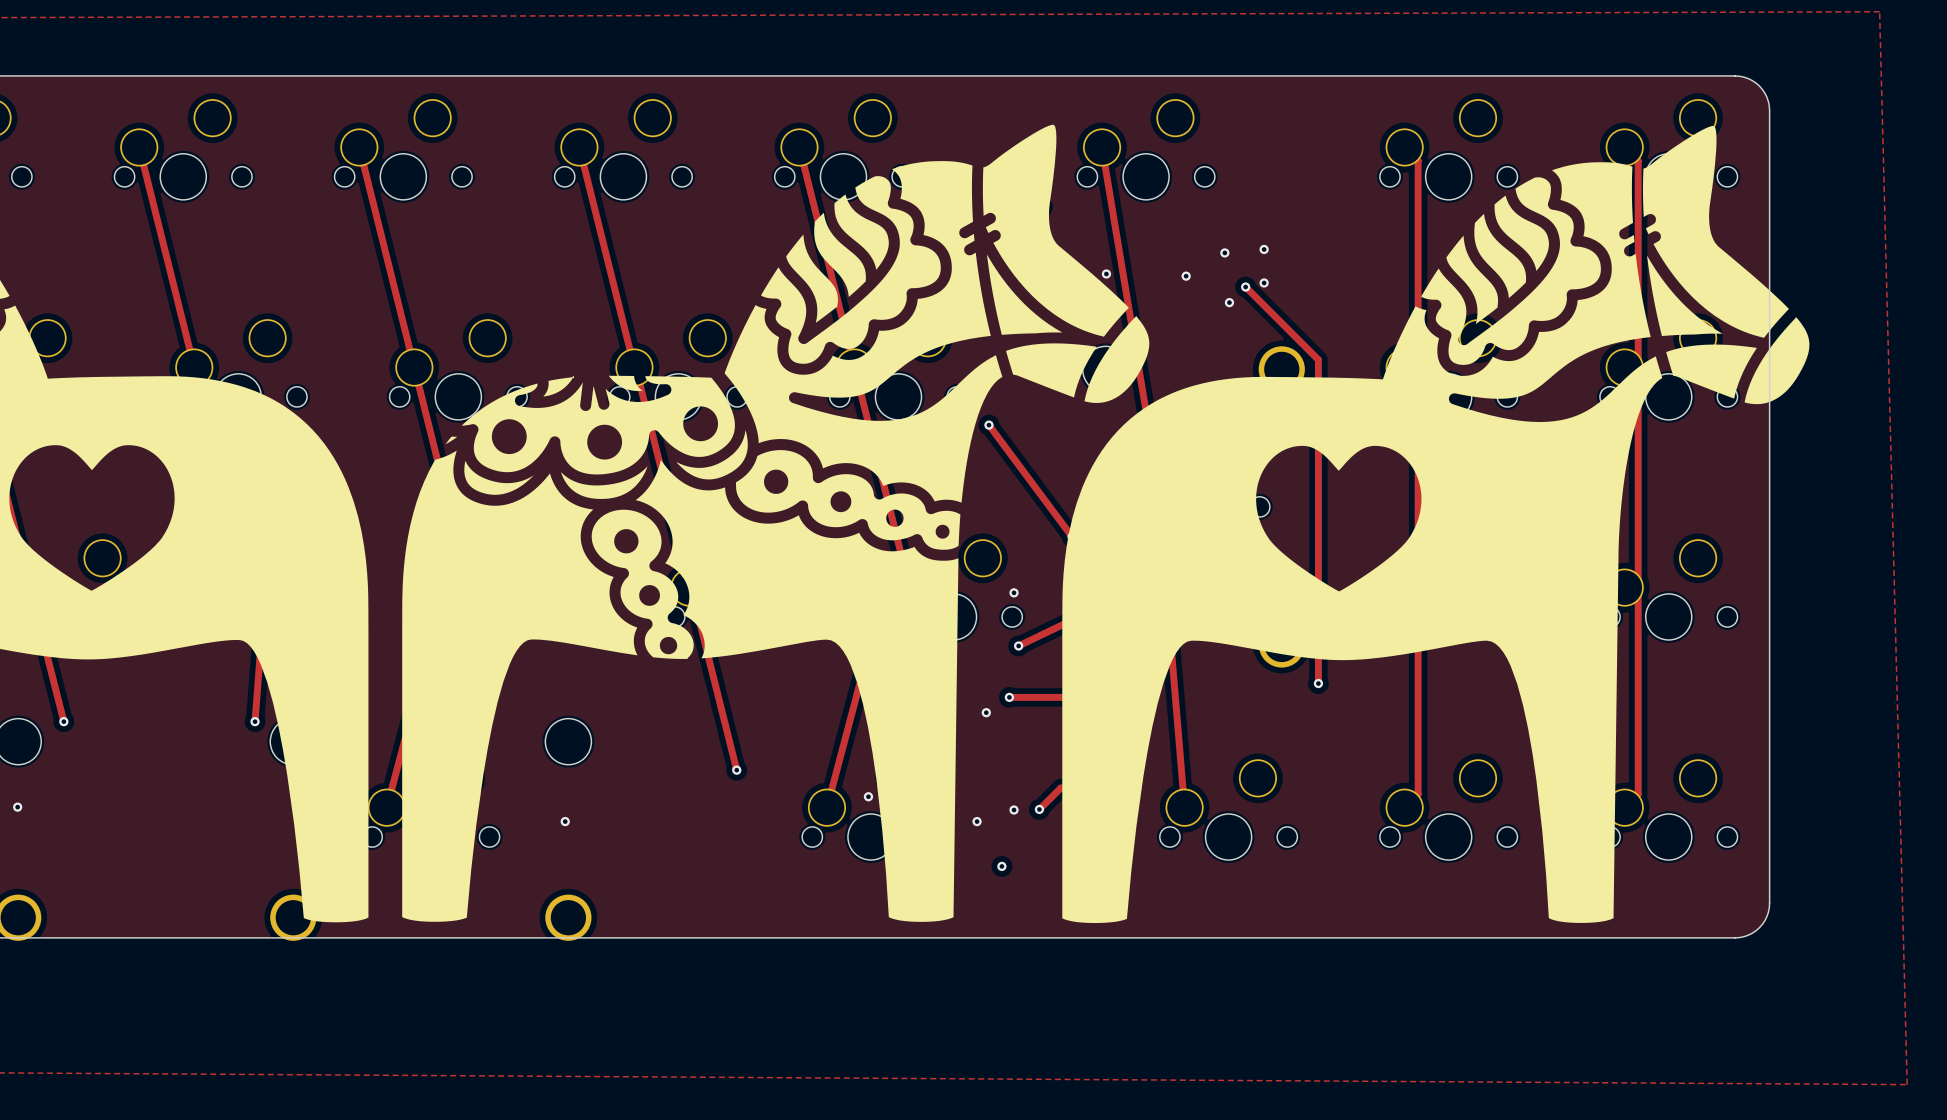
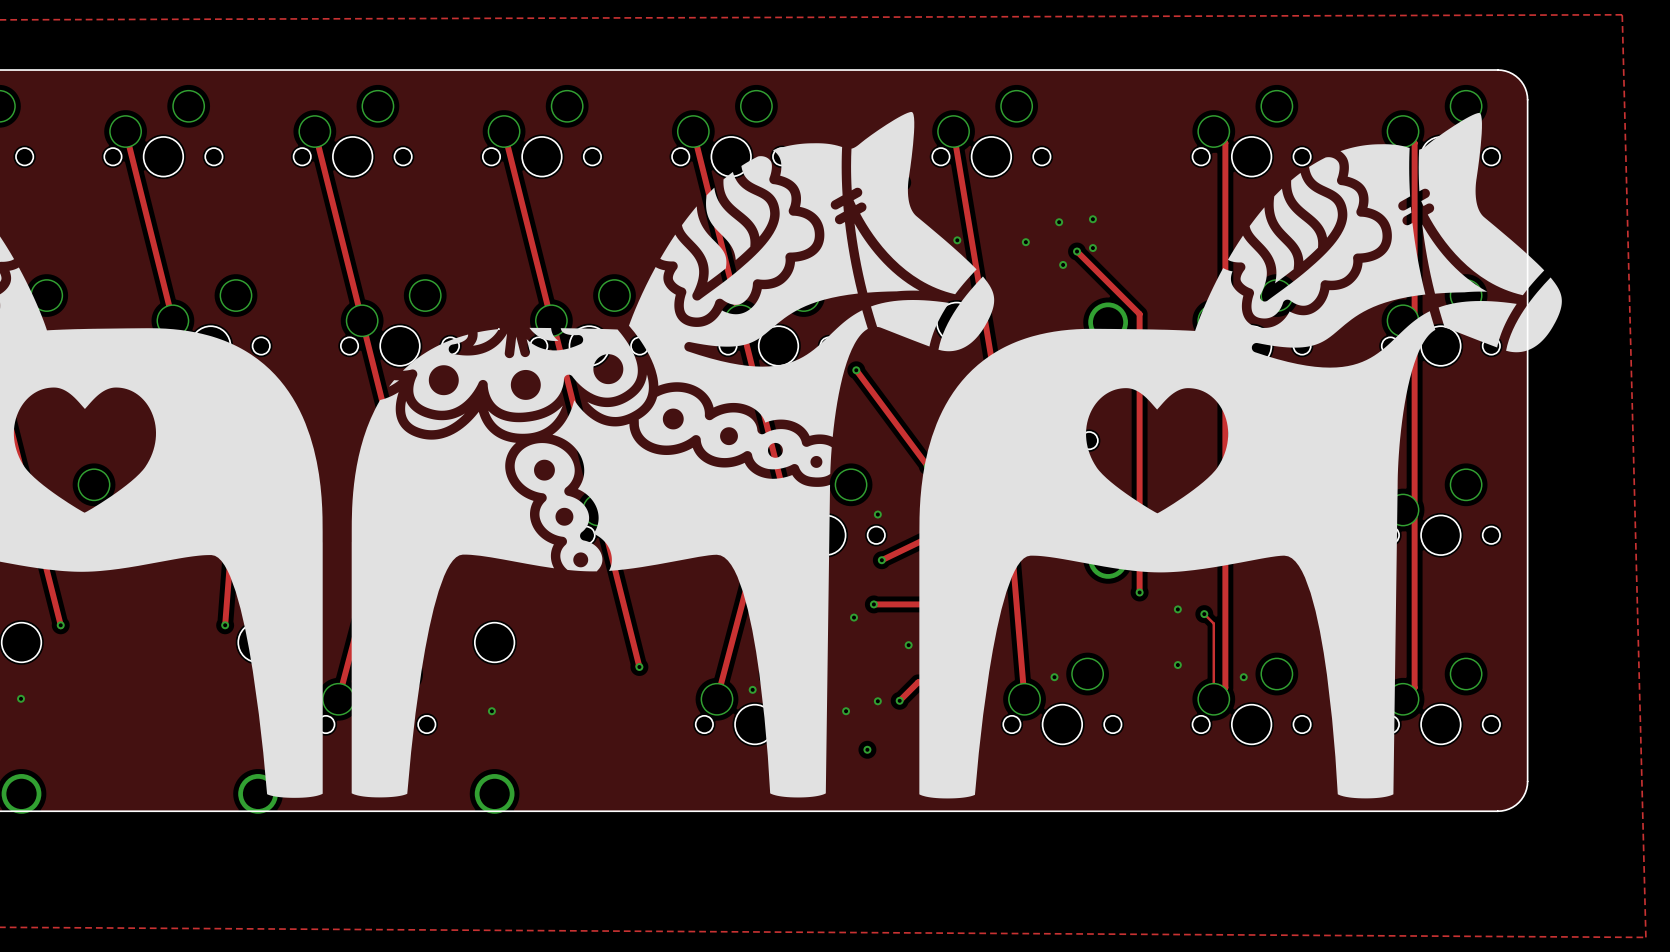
via: none -> (1177, 609)
track: none -> (1204, 614) (1213, 623) (1213, 699)
via: none -> (1204, 614)
via: none -> (908, 645)
via: none -> (1177, 665)
via: none -> (1054, 677)
via: none -> (1243, 677)

